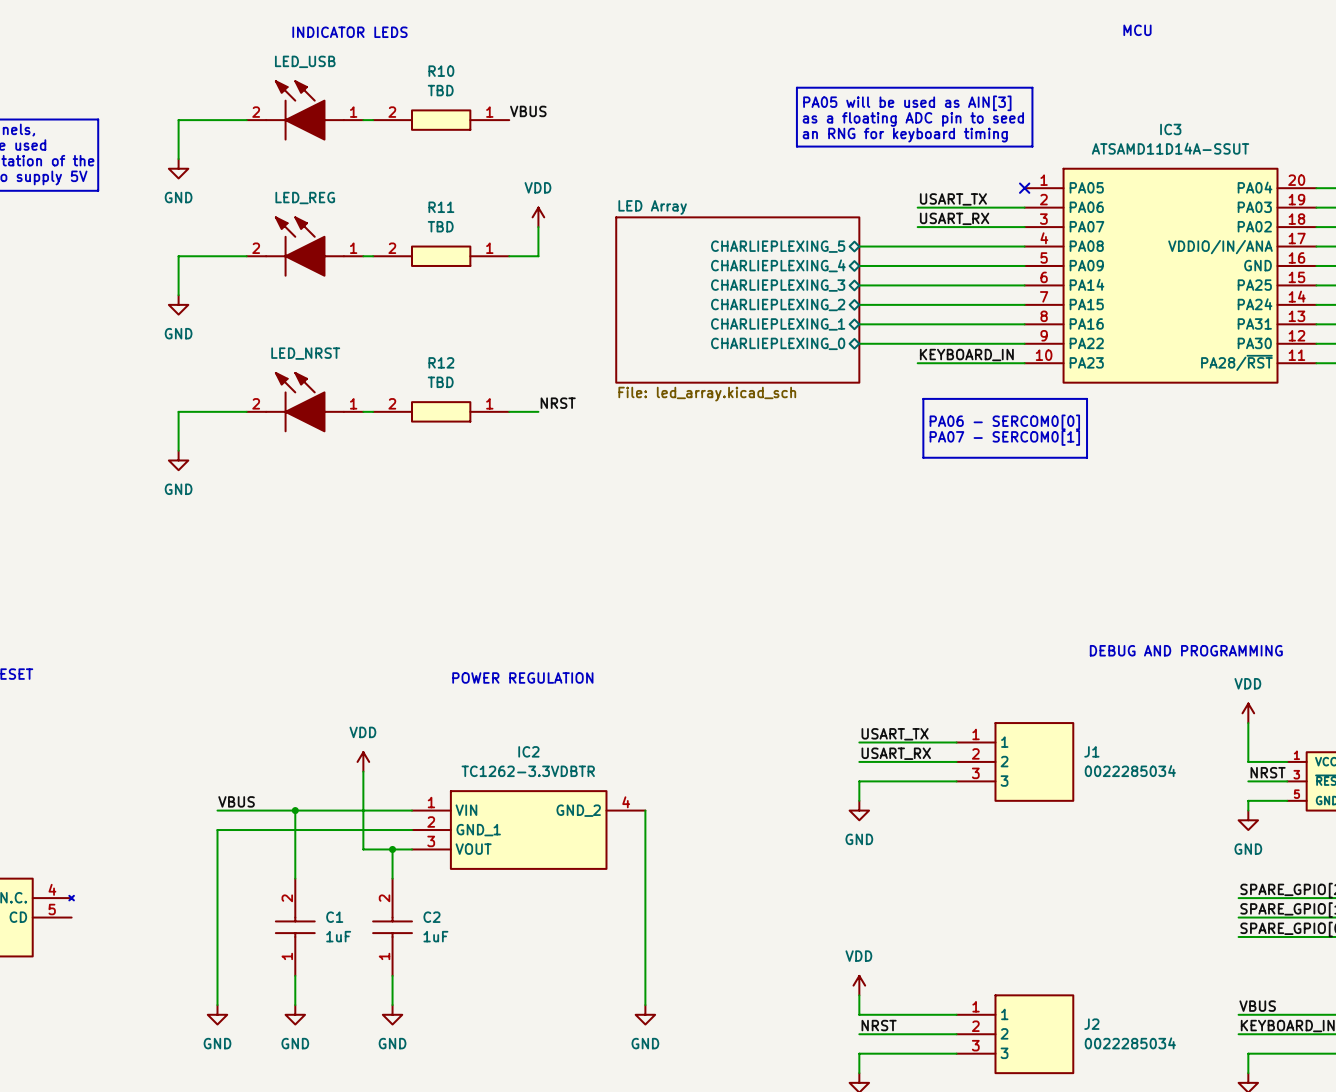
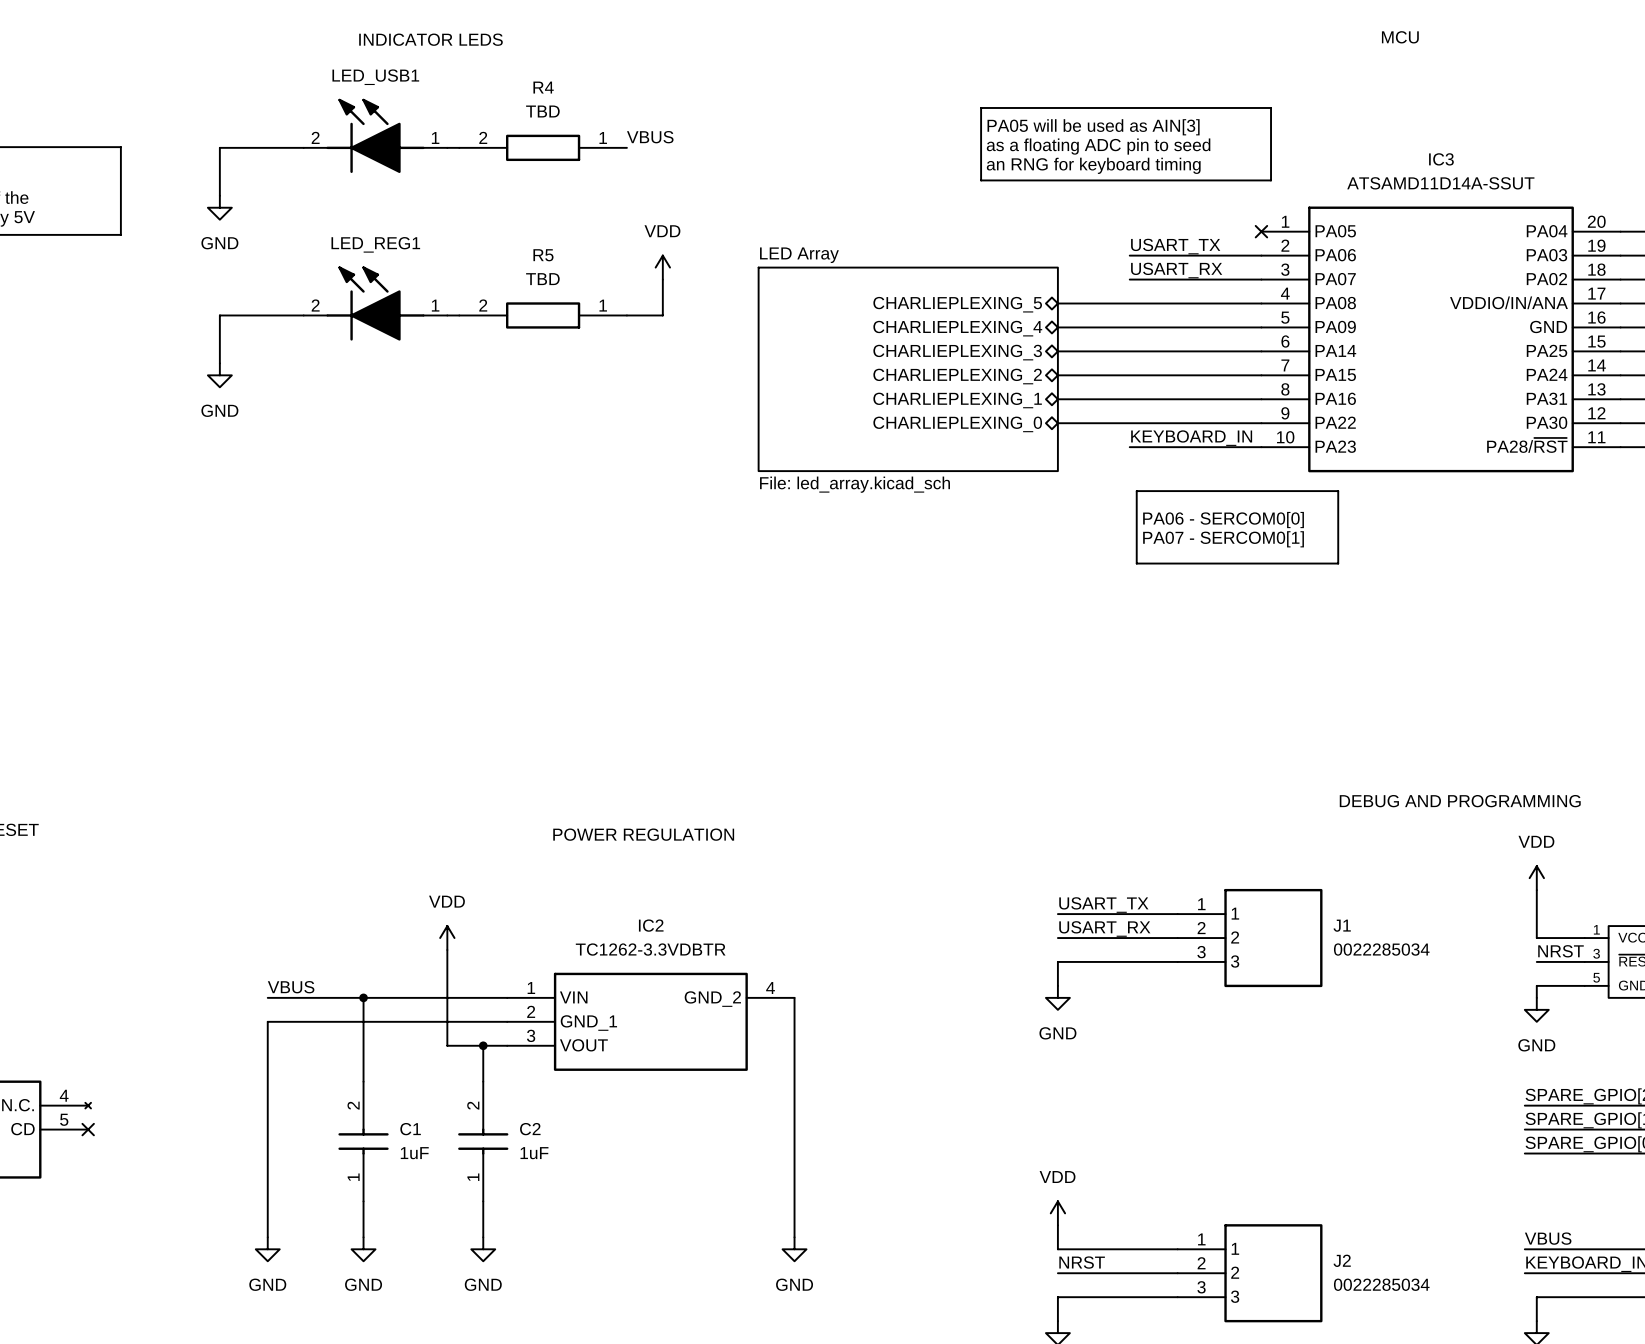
LED_USB name: LED_USB (305, 61) -> LED_USB1 (375, 77)
R10 name: R10 (441, 71) -> R4 (543, 87)
LED_REG name: LED_REG (305, 198) -> LED_REG1 (375, 244)
R11 name: R11 (441, 207) -> R5 (543, 255)
LED_NRST: (305, 402) -> none
label: NRST (558, 403) -> none
wire: (246, 411) (178, 411) (178, 450) -> none
wire: (363, 411) (373, 411) -> none
R12: TBD (441, 411) -> none
wire: (509, 411) (538, 411) -> none
power symbol: GND (178, 460) -> none
no-connect mark: none -> (88, 1129)

